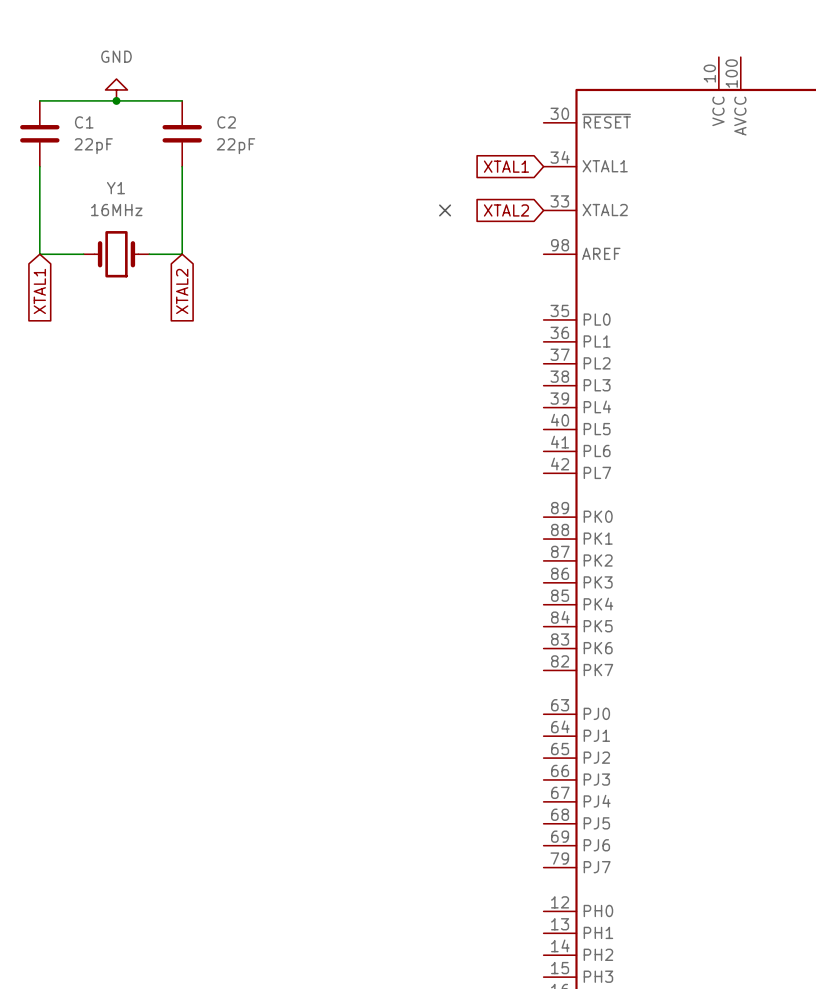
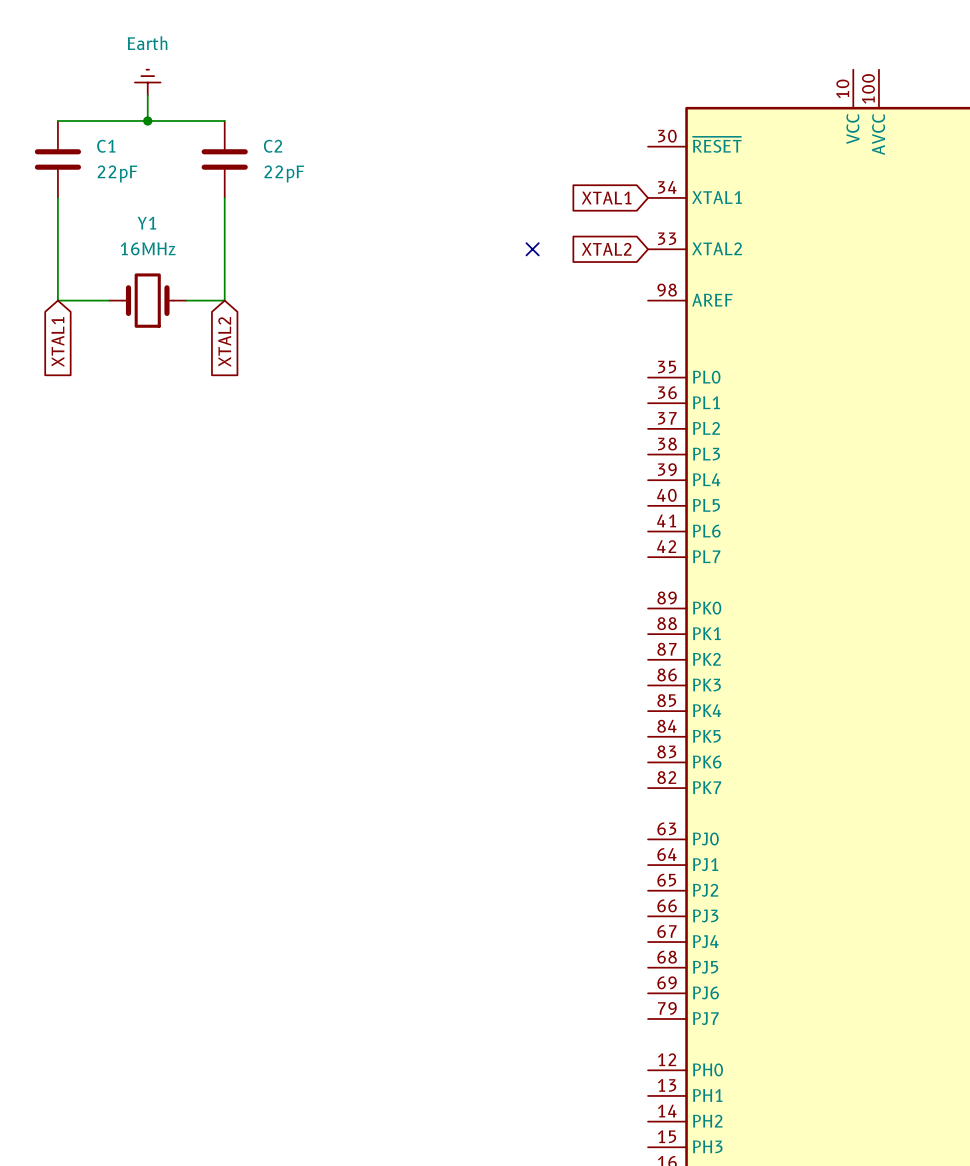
power symbol: none -> Earth (147, 82)
power symbol: GND (116, 89) -> none

